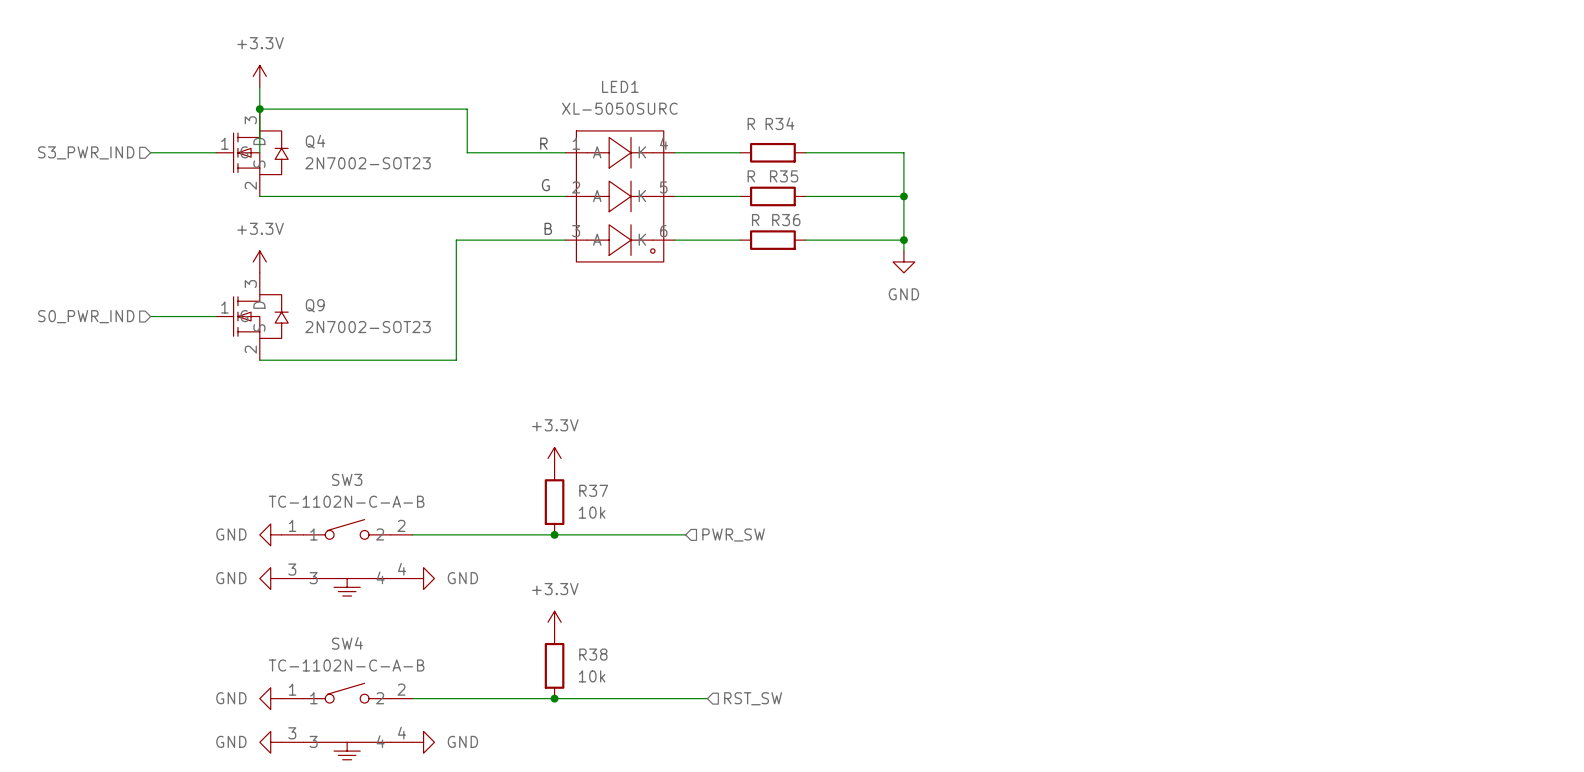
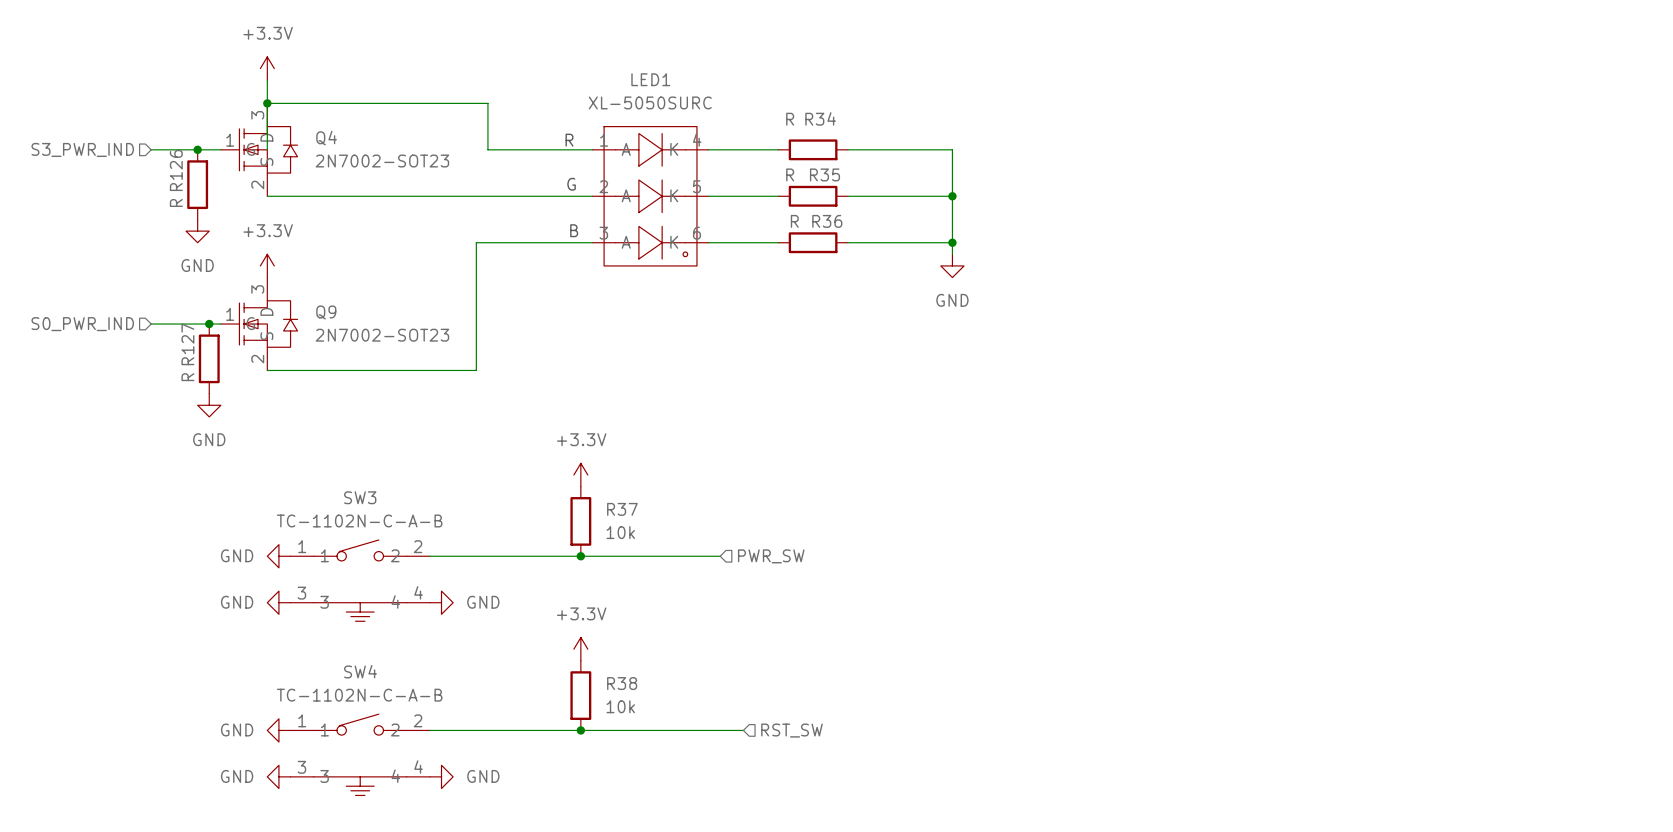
junction: none -> (197, 149)
R126: none -> R (197, 184)
power symbol: none -> GND (197, 231)
junction: none -> (209, 324)
R127: none -> R (209, 358)
power symbol: none -> GND (209, 405)

